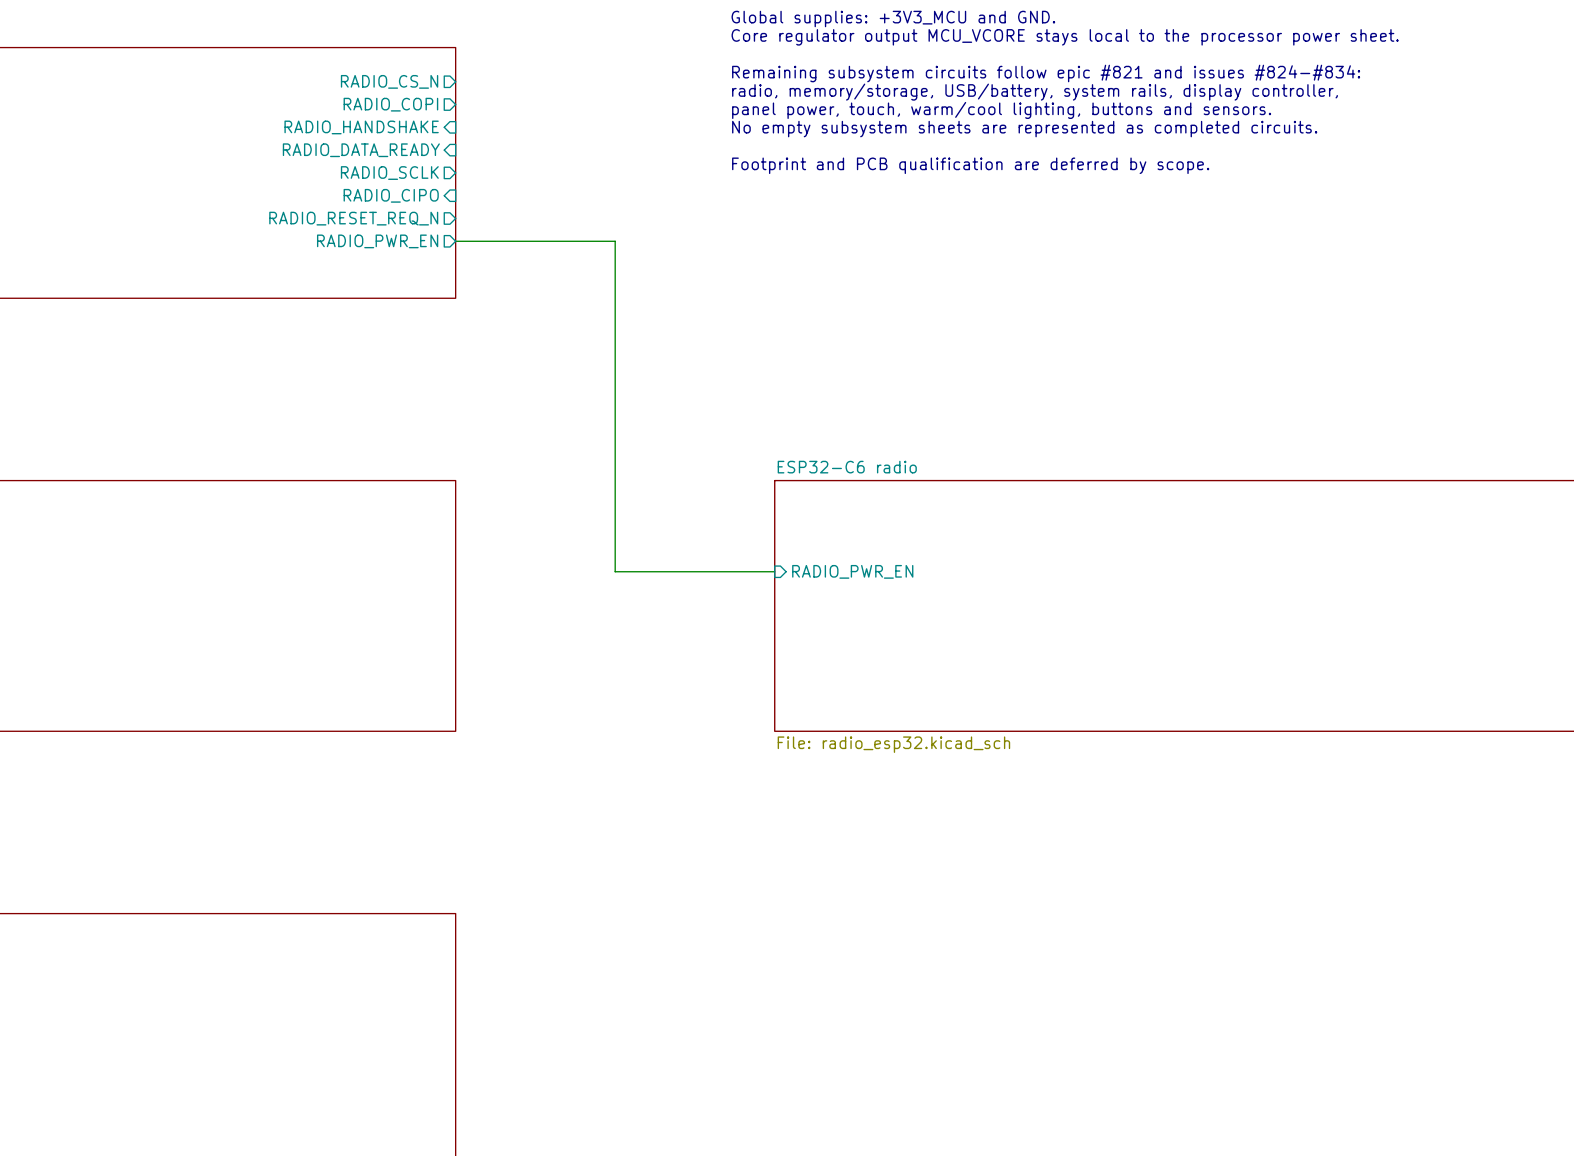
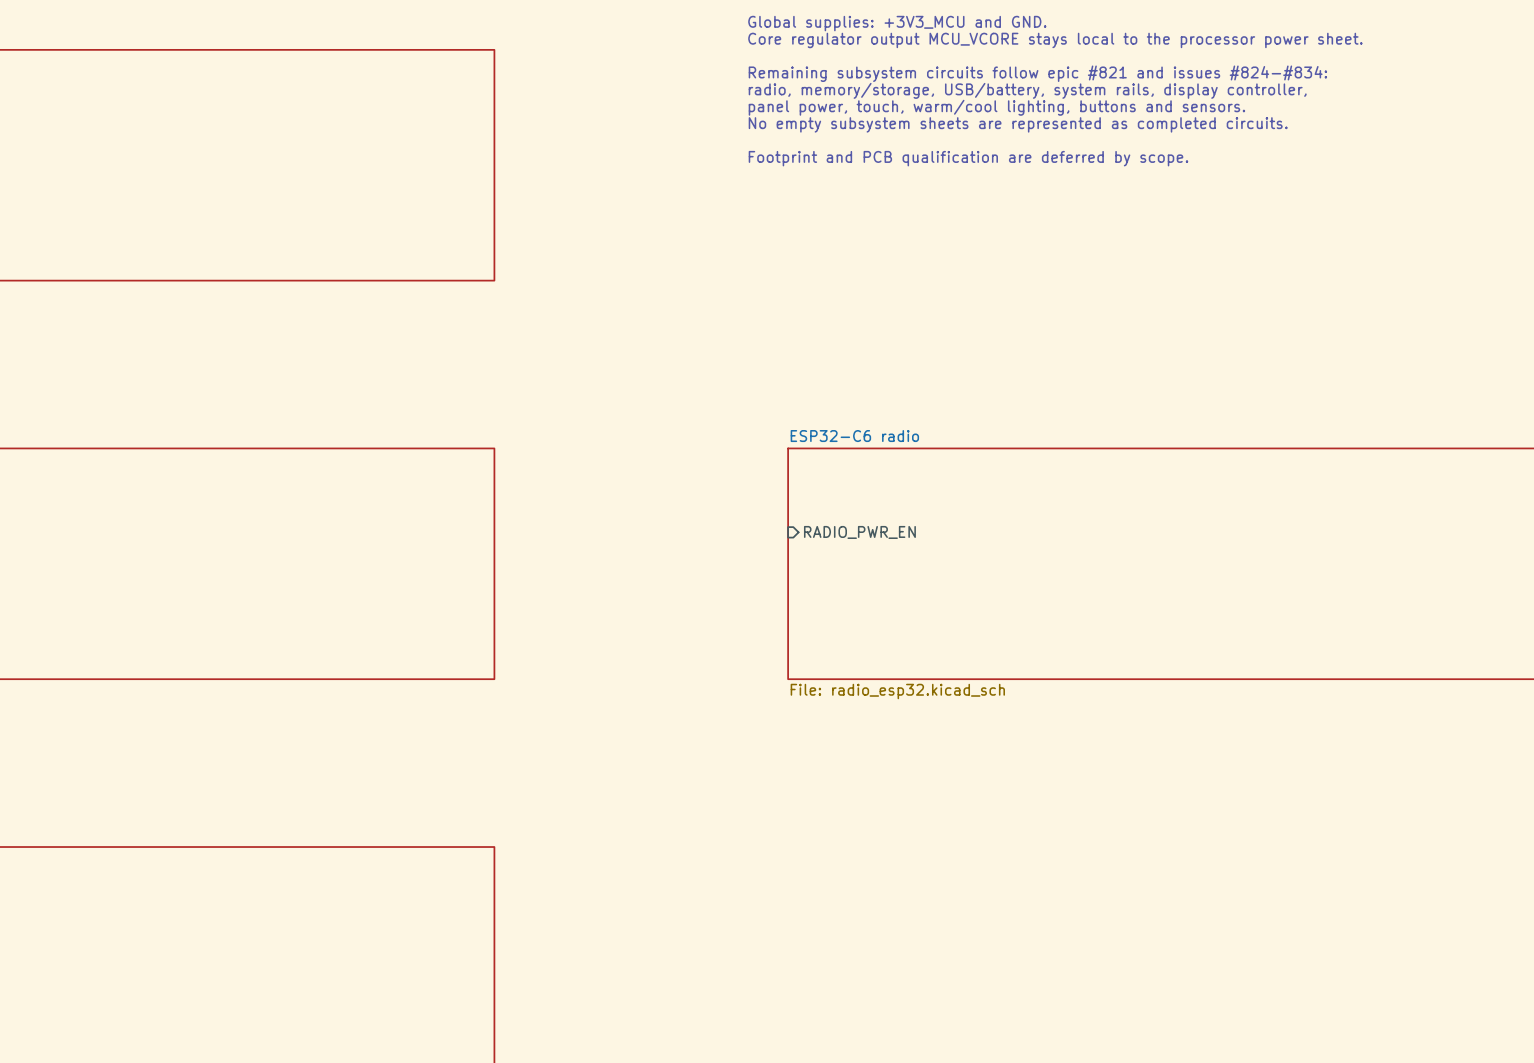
sheet pin: RADIO_CS_N (389, 81) -> none
sheet pin: RADIO_COPI (390, 104) -> none
sheet pin: RADIO_HANDSHAKE (361, 127) -> none
sheet pin: RADIO_DATA_READY (361, 150) -> none
sheet pin: RADIO_SCLK (389, 173) -> none
sheet pin: RADIO_CIPO (391, 195) -> none
sheet pin: RADIO_RESET_REQ_N (353, 218) -> none
sheet pin: RADIO_PWR_EN (377, 241) -> none
wire: (455, 241) (615, 241) (615, 571) (774, 571) -> none

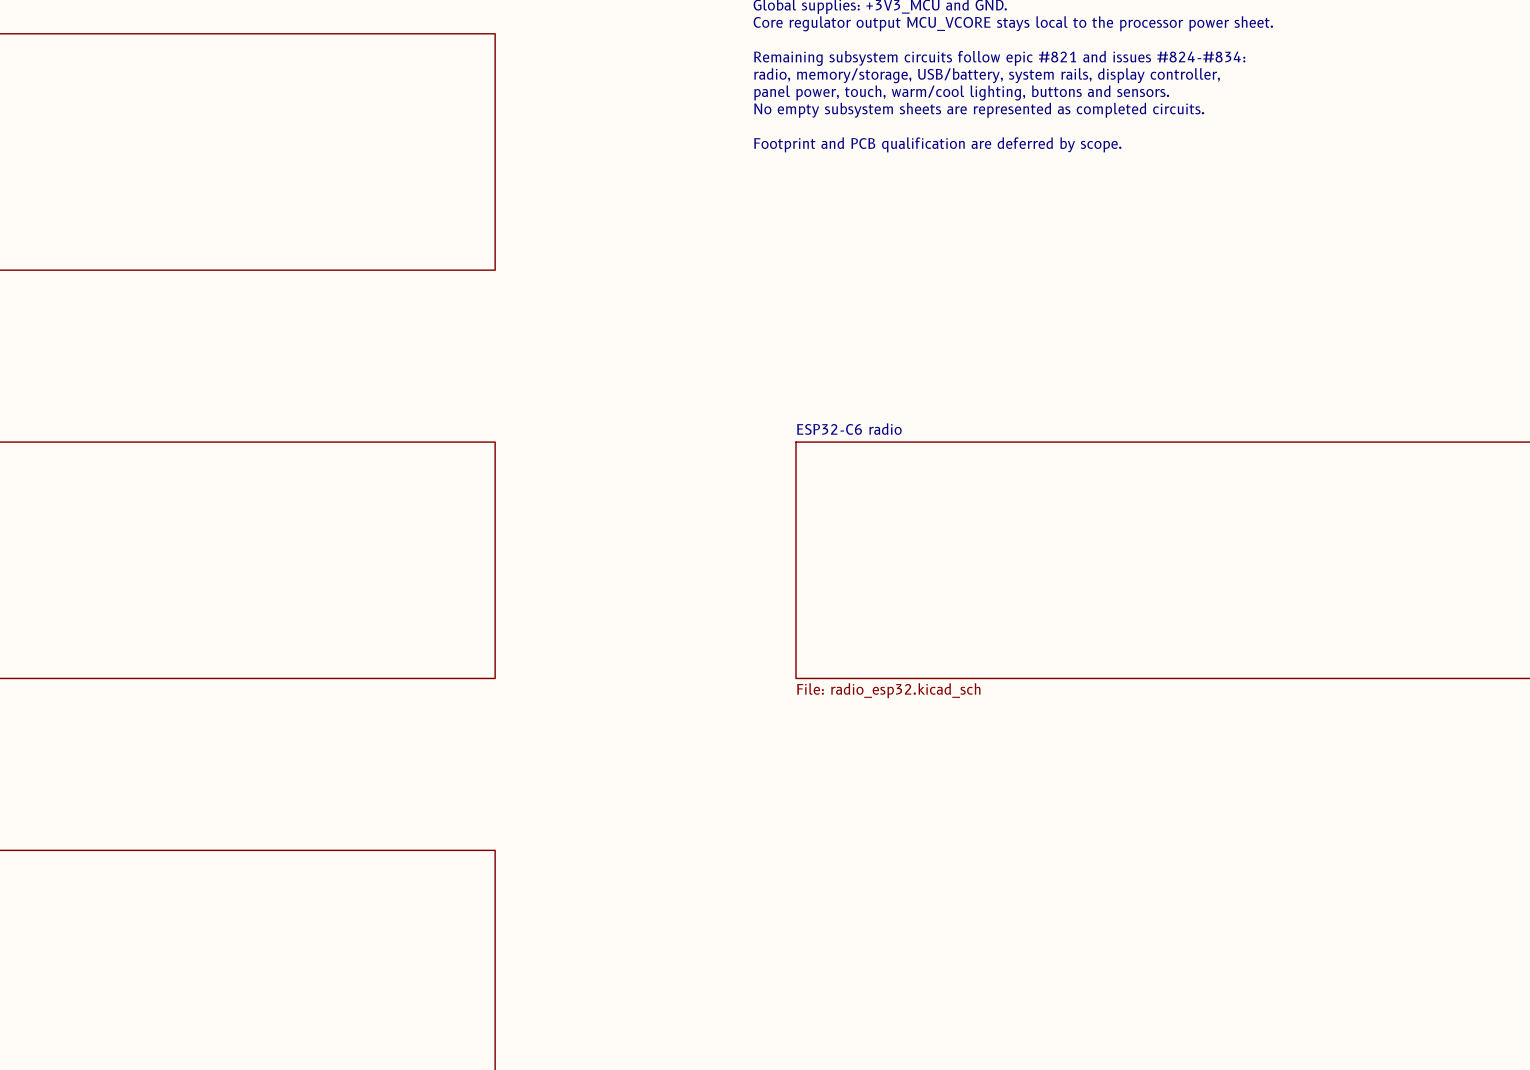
sheet pin: RADIO_PWR_EN (859, 532) -> none

